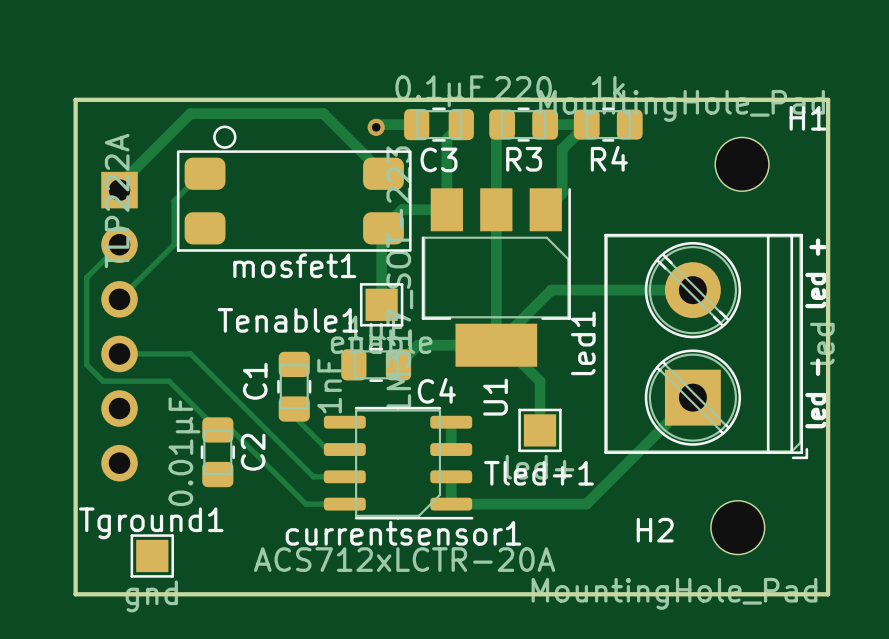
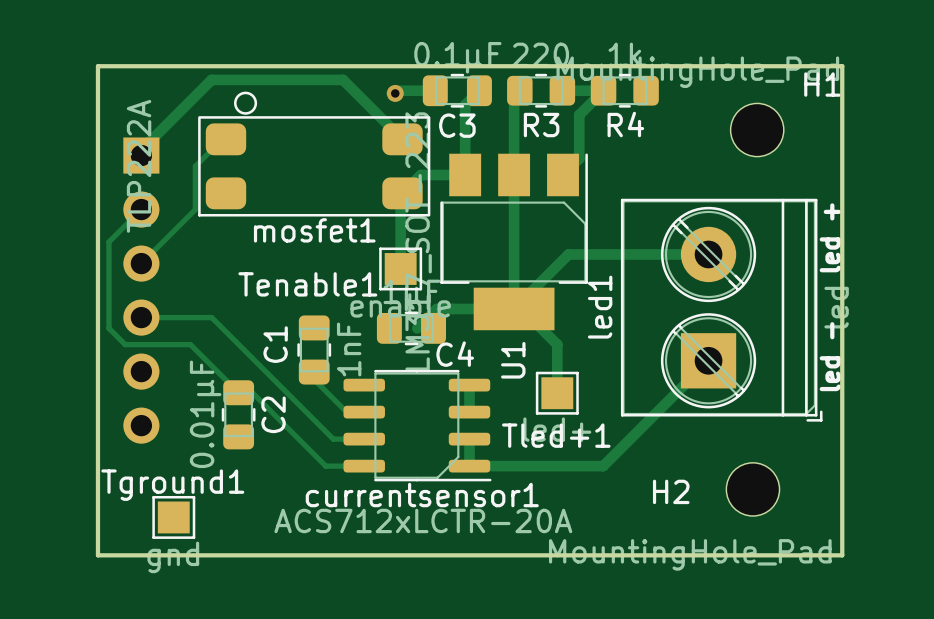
C4 position: (376, 364) -> (411, 328)

